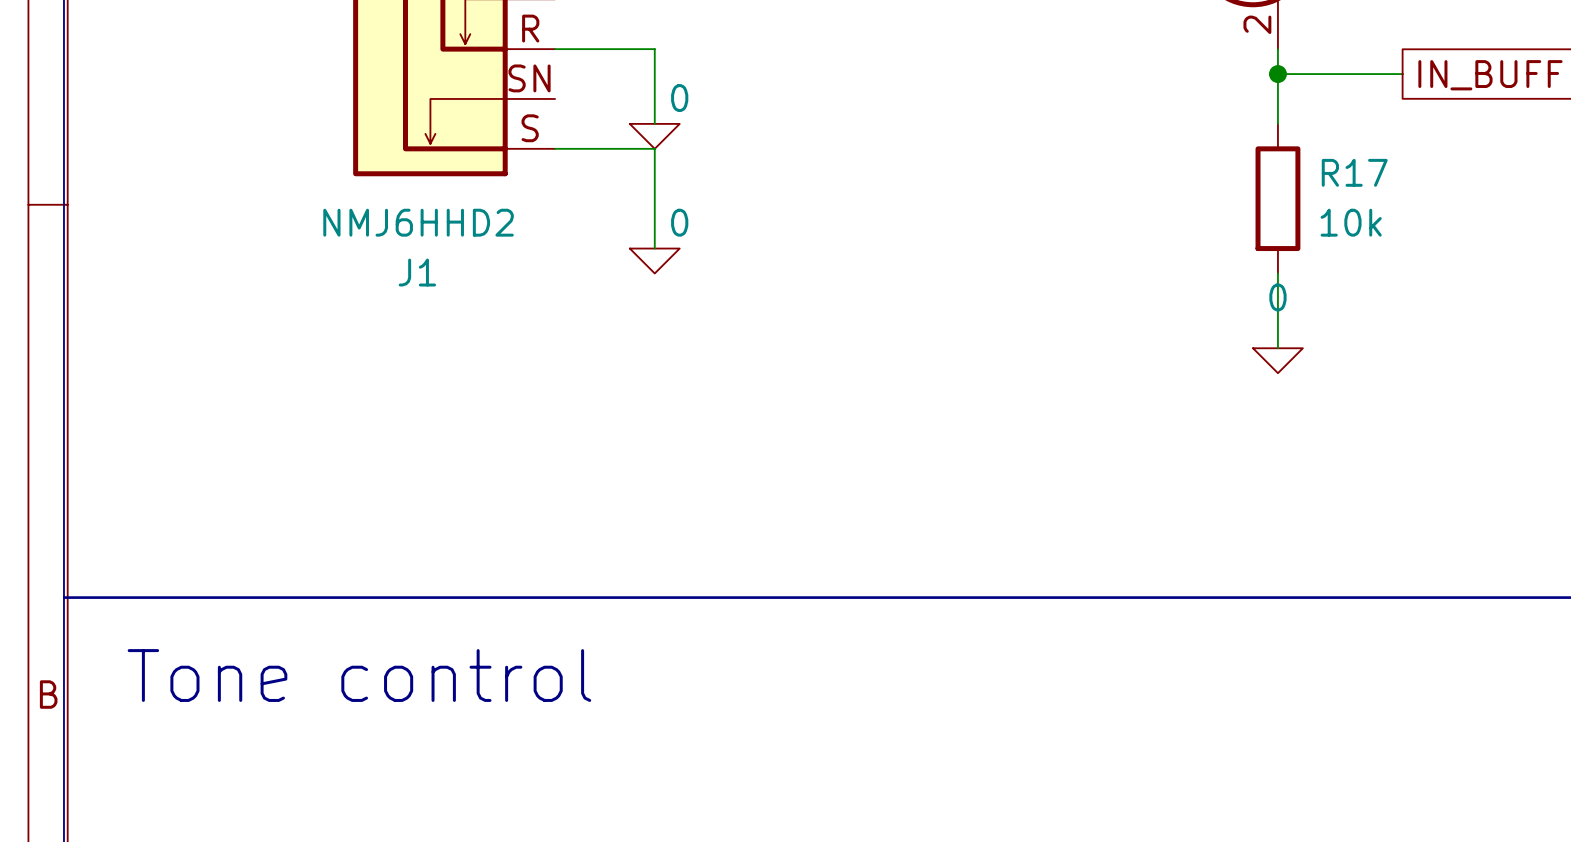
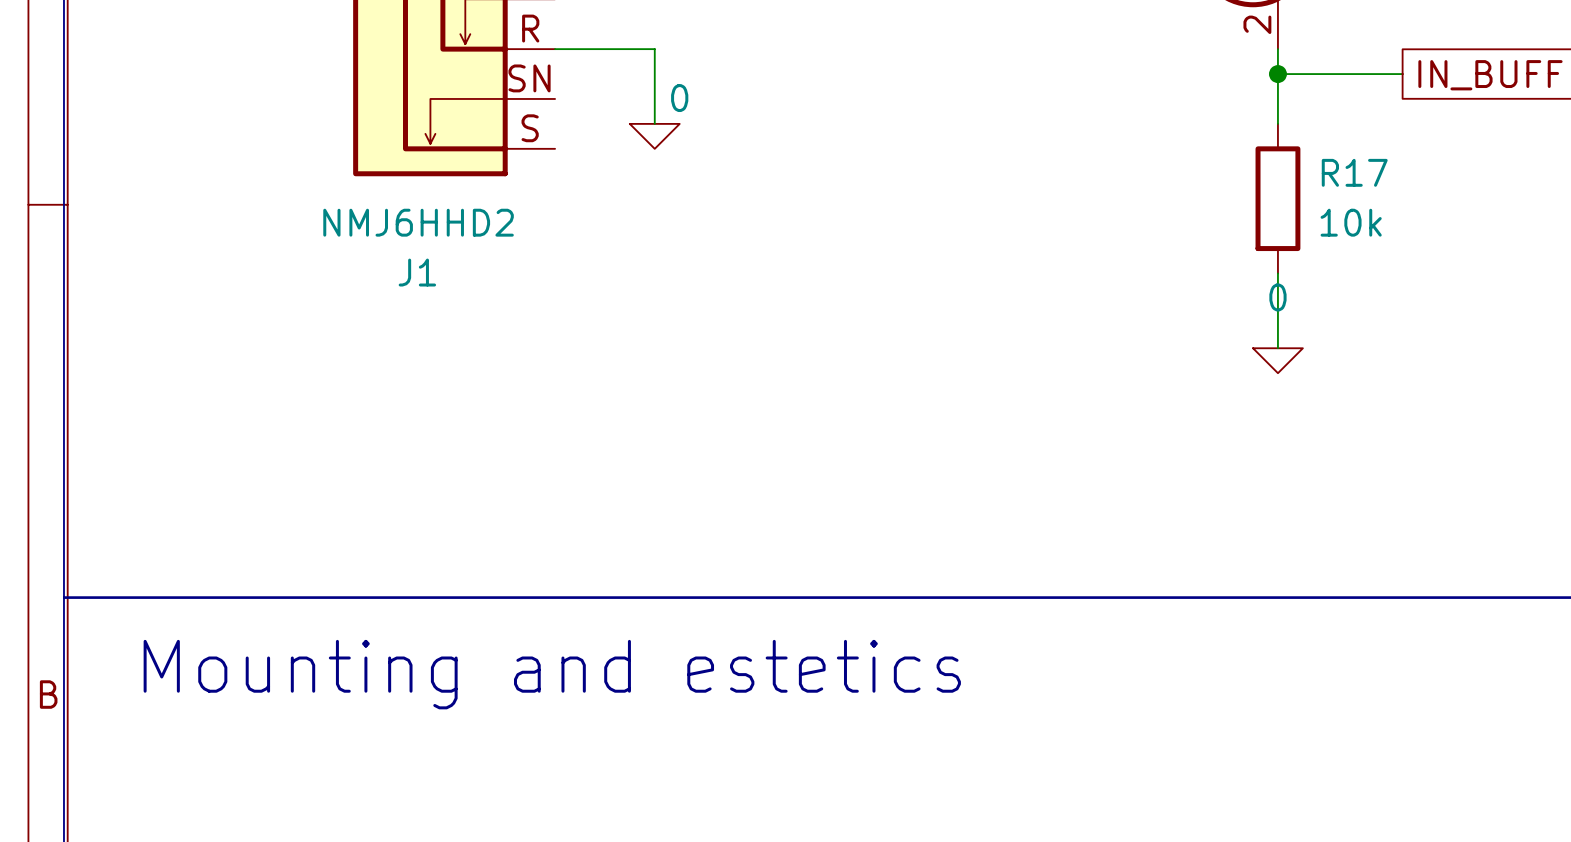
wire: (555, 148) (654, 148) (654, 248) -> none
power symbol: 0 (654, 261) -> none
text: none -> Mounting and estetics (552, 674)
text: Tone control (359, 675) -> none

